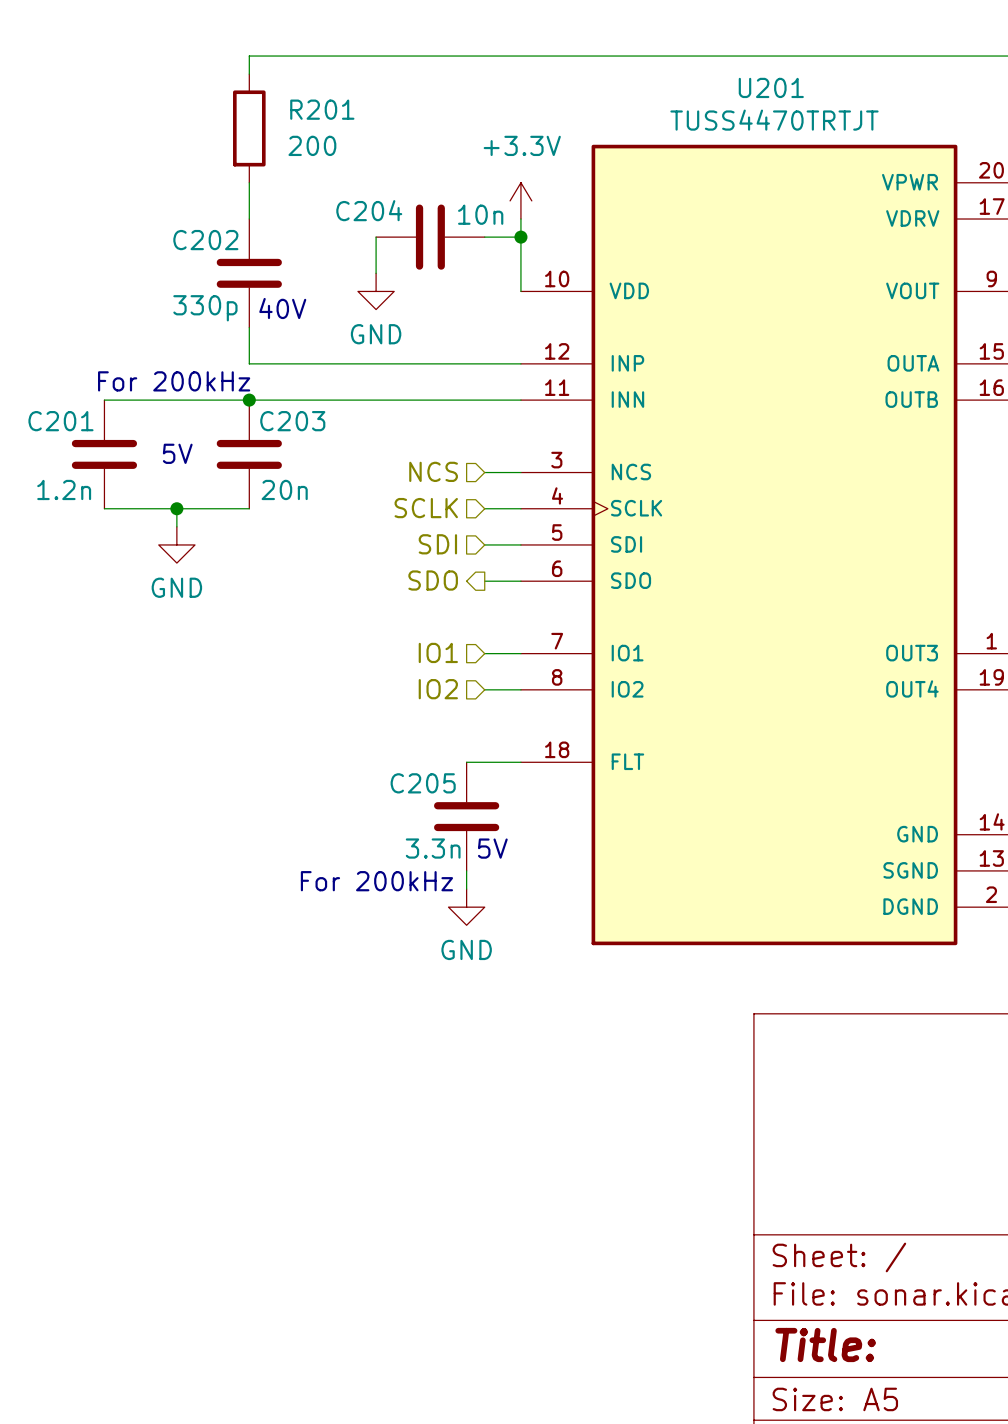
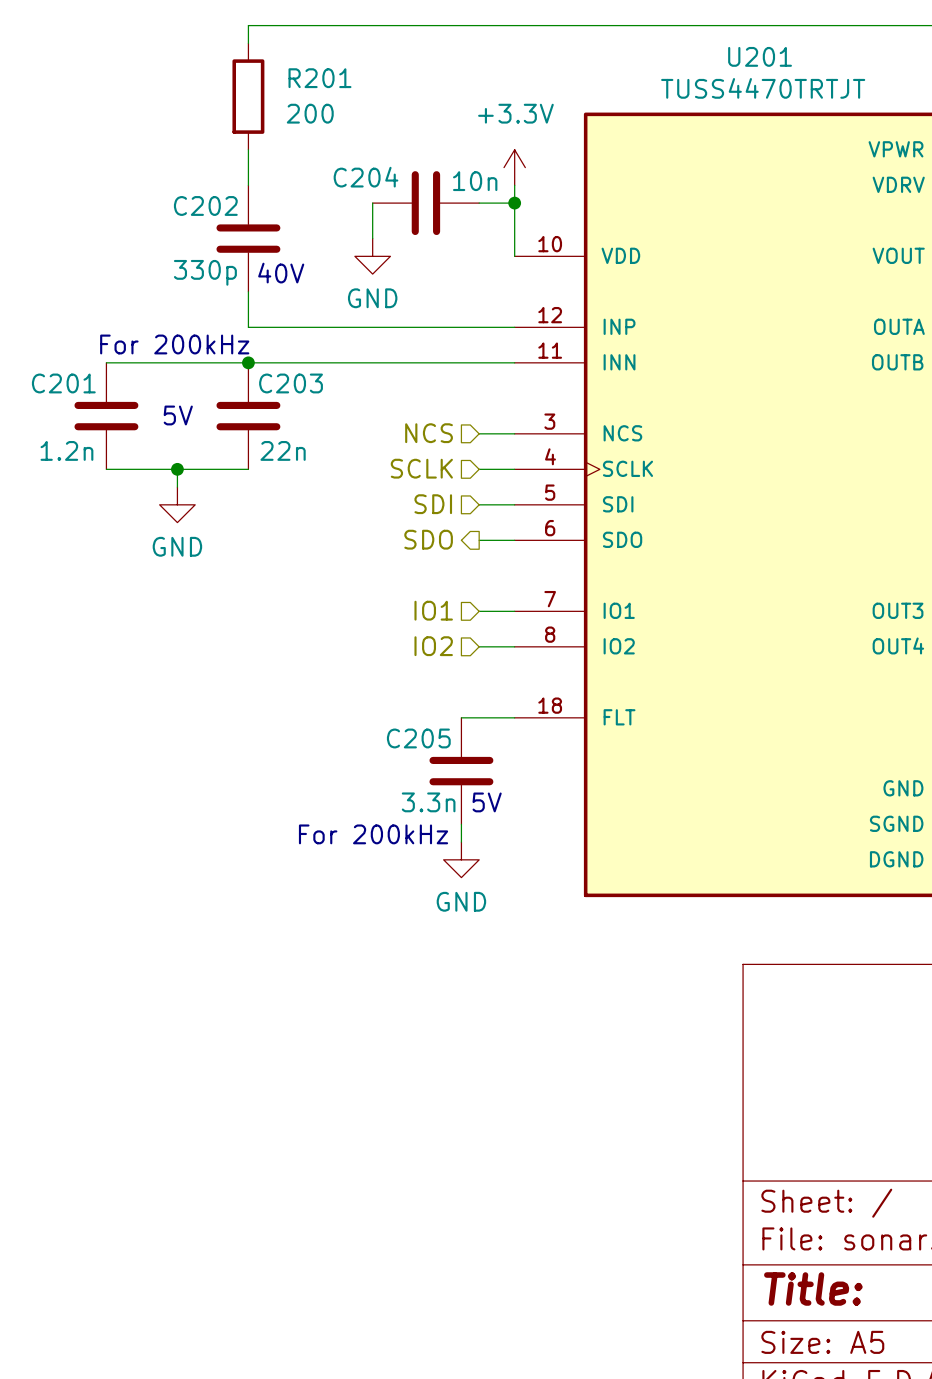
C203 value: 20n (284, 489) -> 22n (283, 450)

